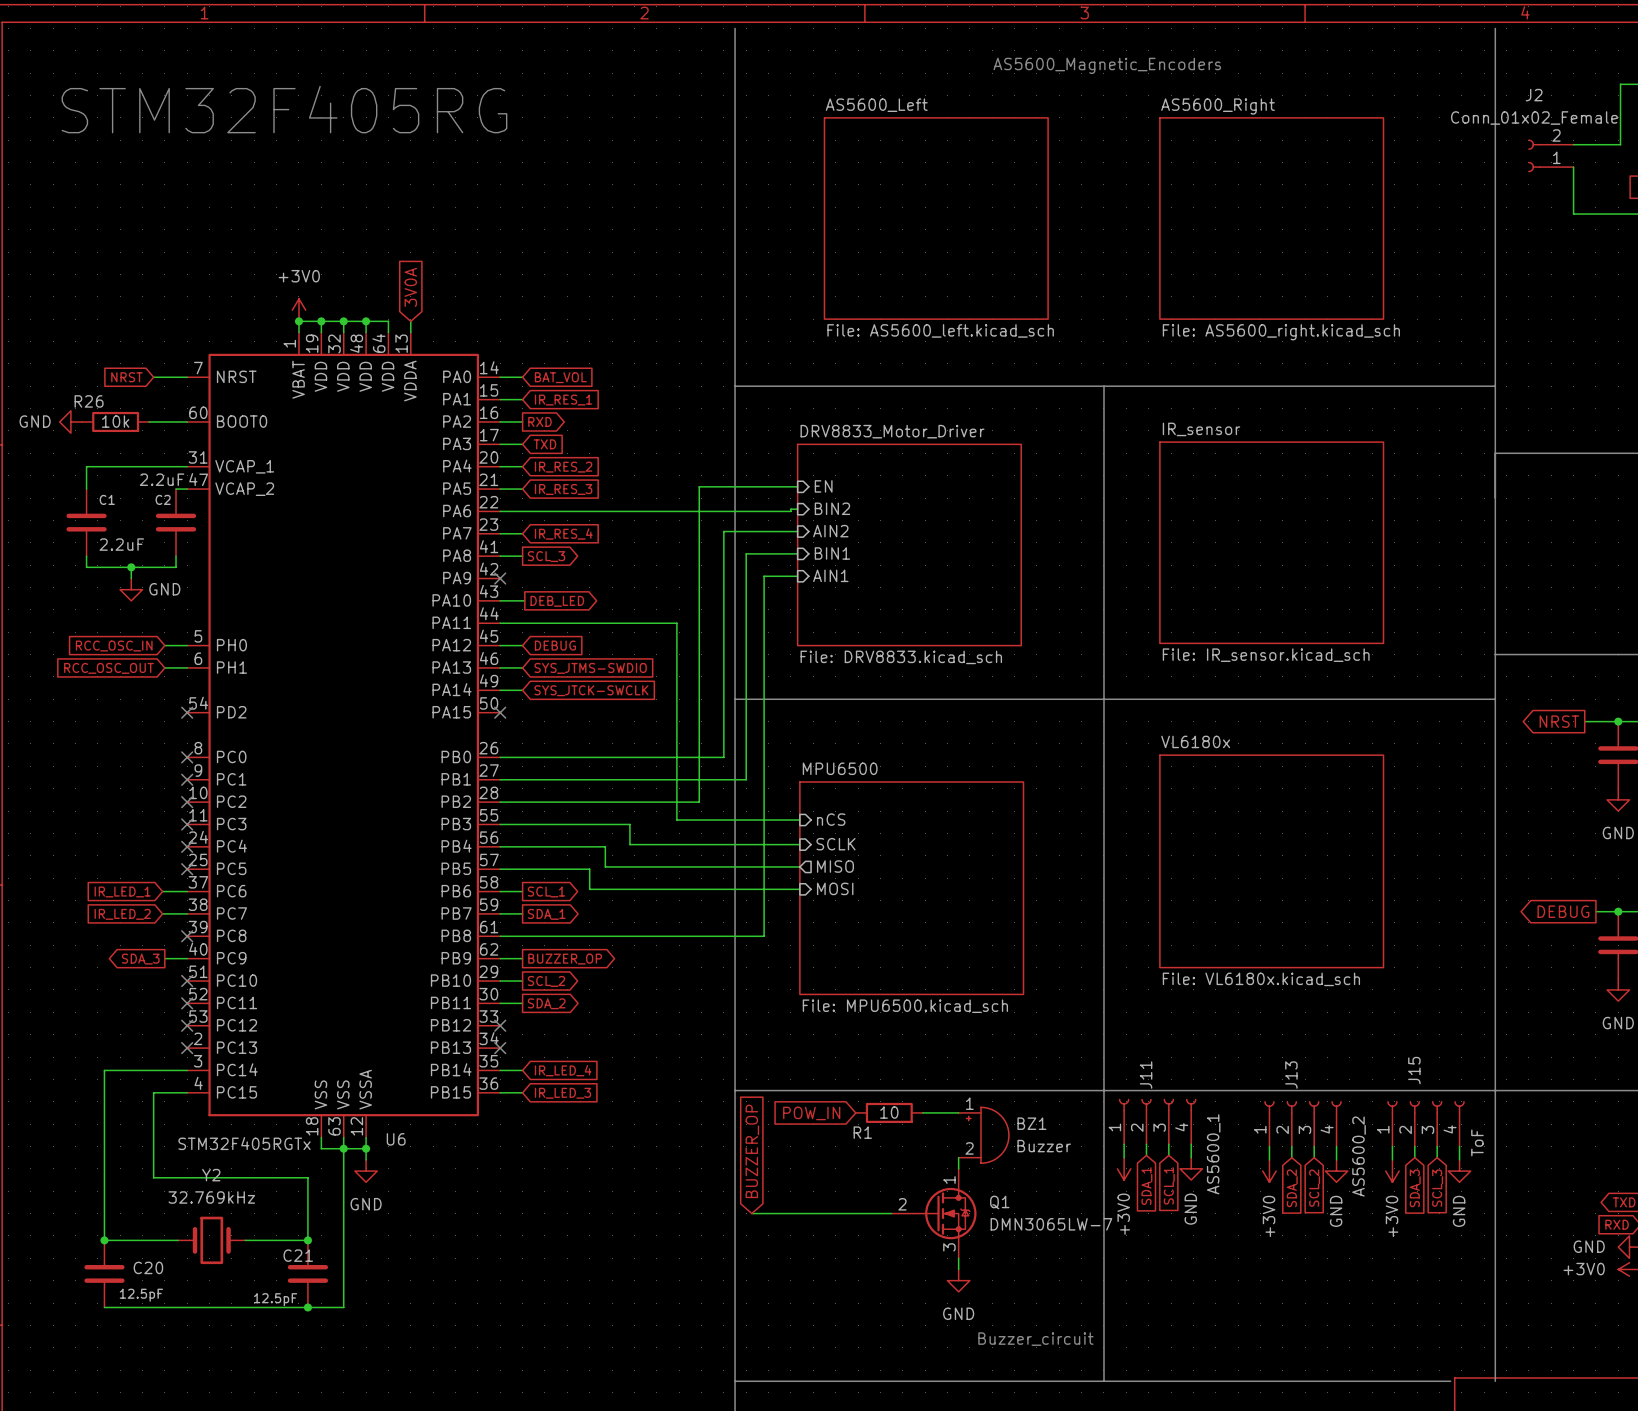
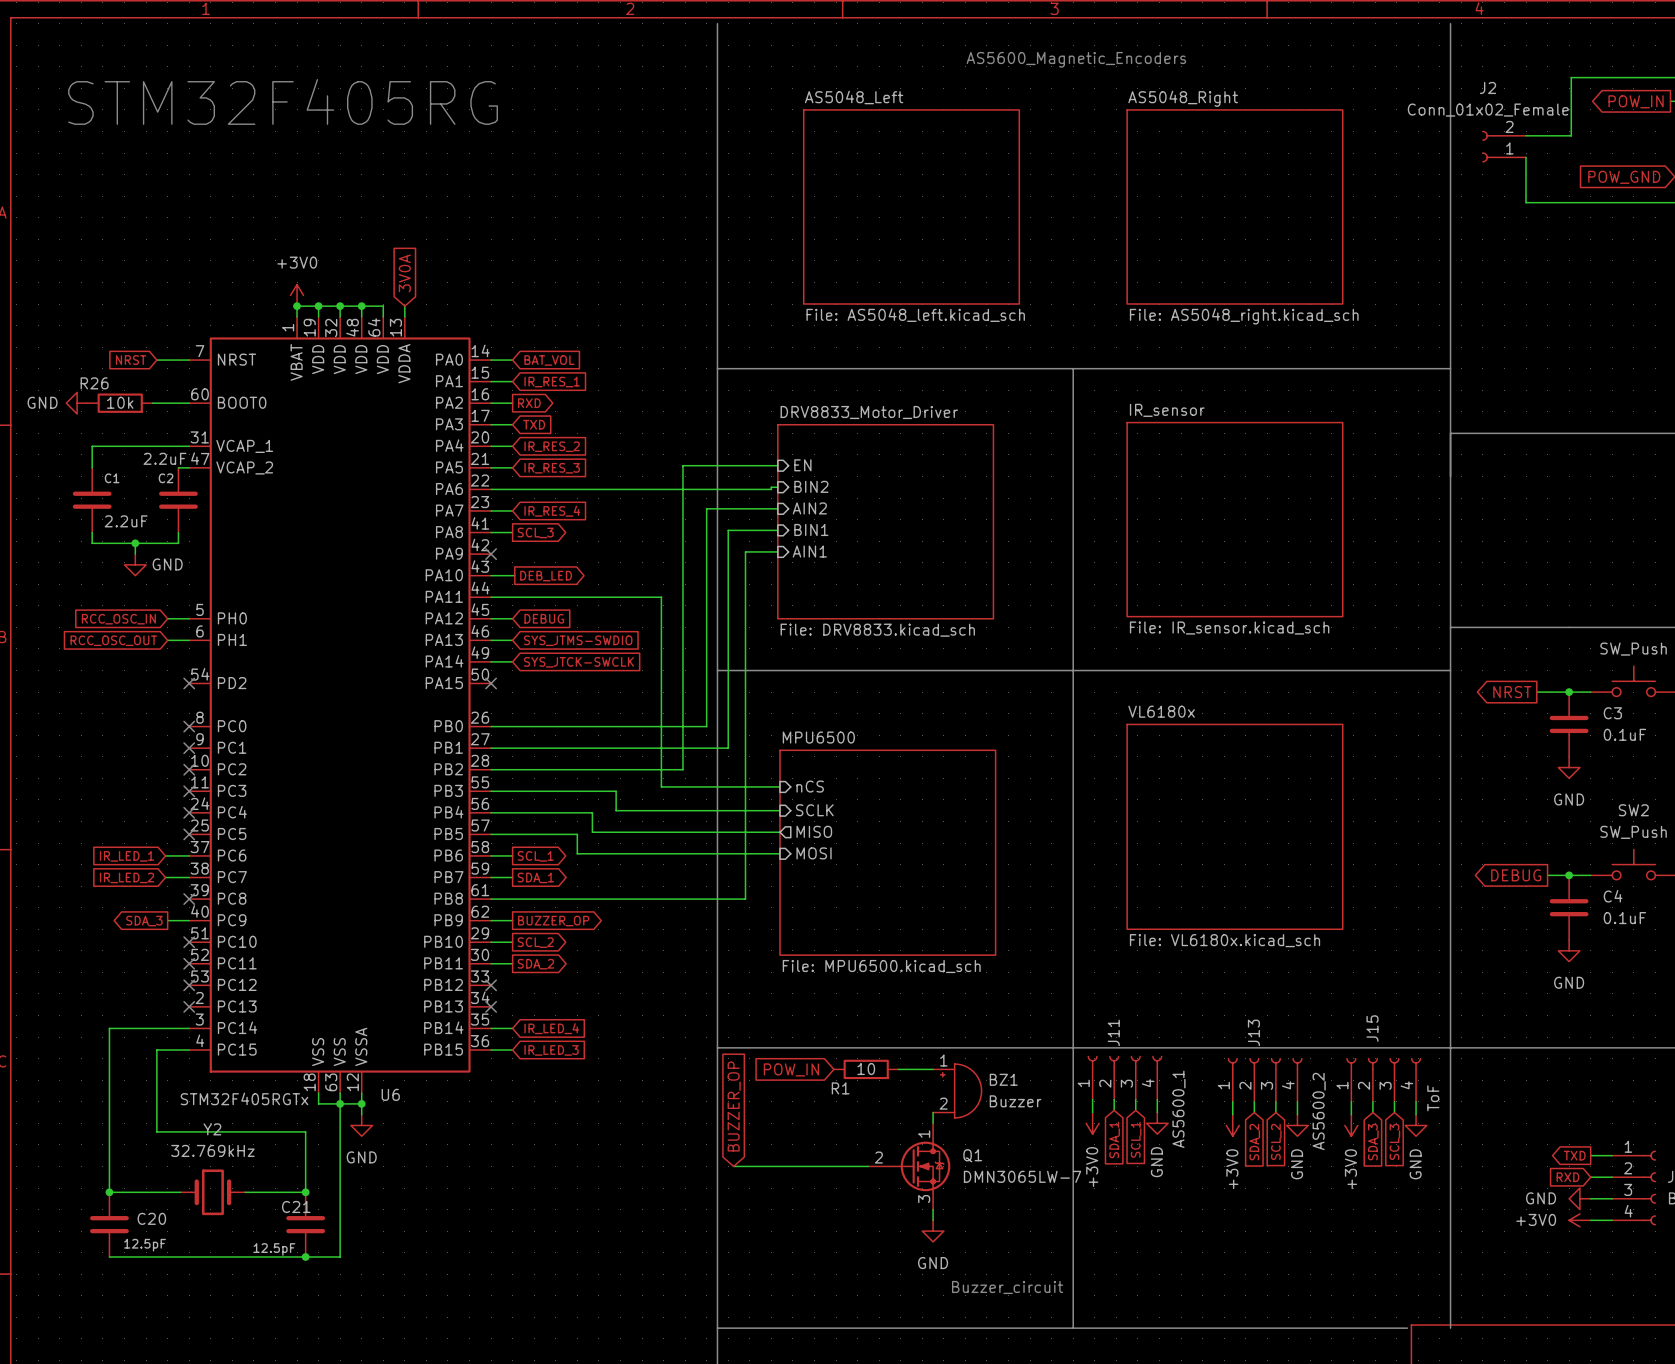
sheet AS5600_Left name: AS5600_Left (876, 105) -> AS5048_Left (854, 97)
sheet AS5600_Right name: AS5600_Right (1218, 106) -> AS5048_Right (1183, 98)
sheet AS5600_Left value: File: AS5600_left.kicad_sch (940, 330) -> File: AS5048_left.kicad_sch (915, 315)
sheet AS5600_Right value: File: AS5600_right.kicad_sch (1281, 332) -> File: AS5048_right.kicad_sch (1244, 316)

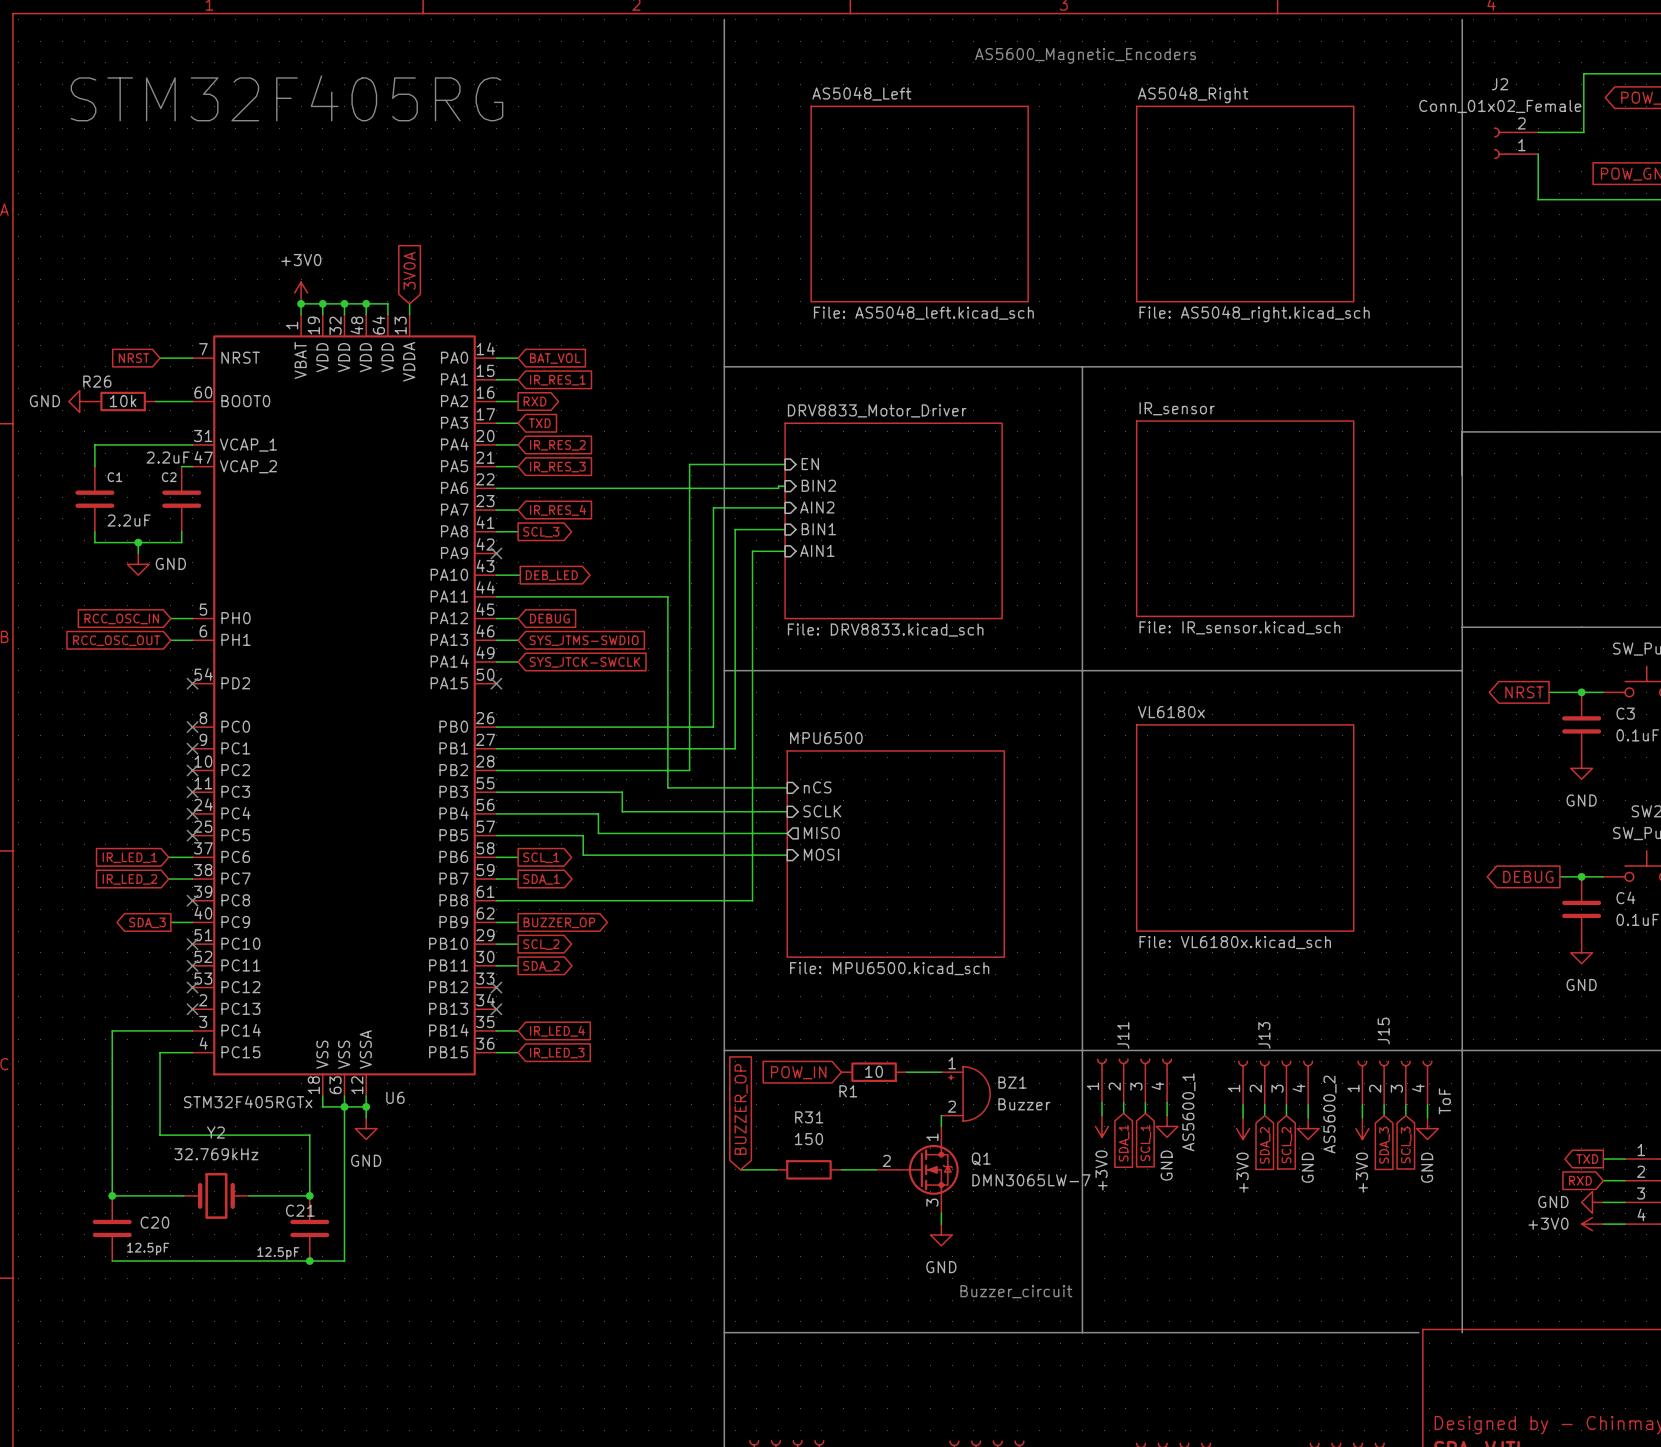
wire: (769, 1166) (833, 1166) -> none
R31: none -> 150 (808, 1169)

